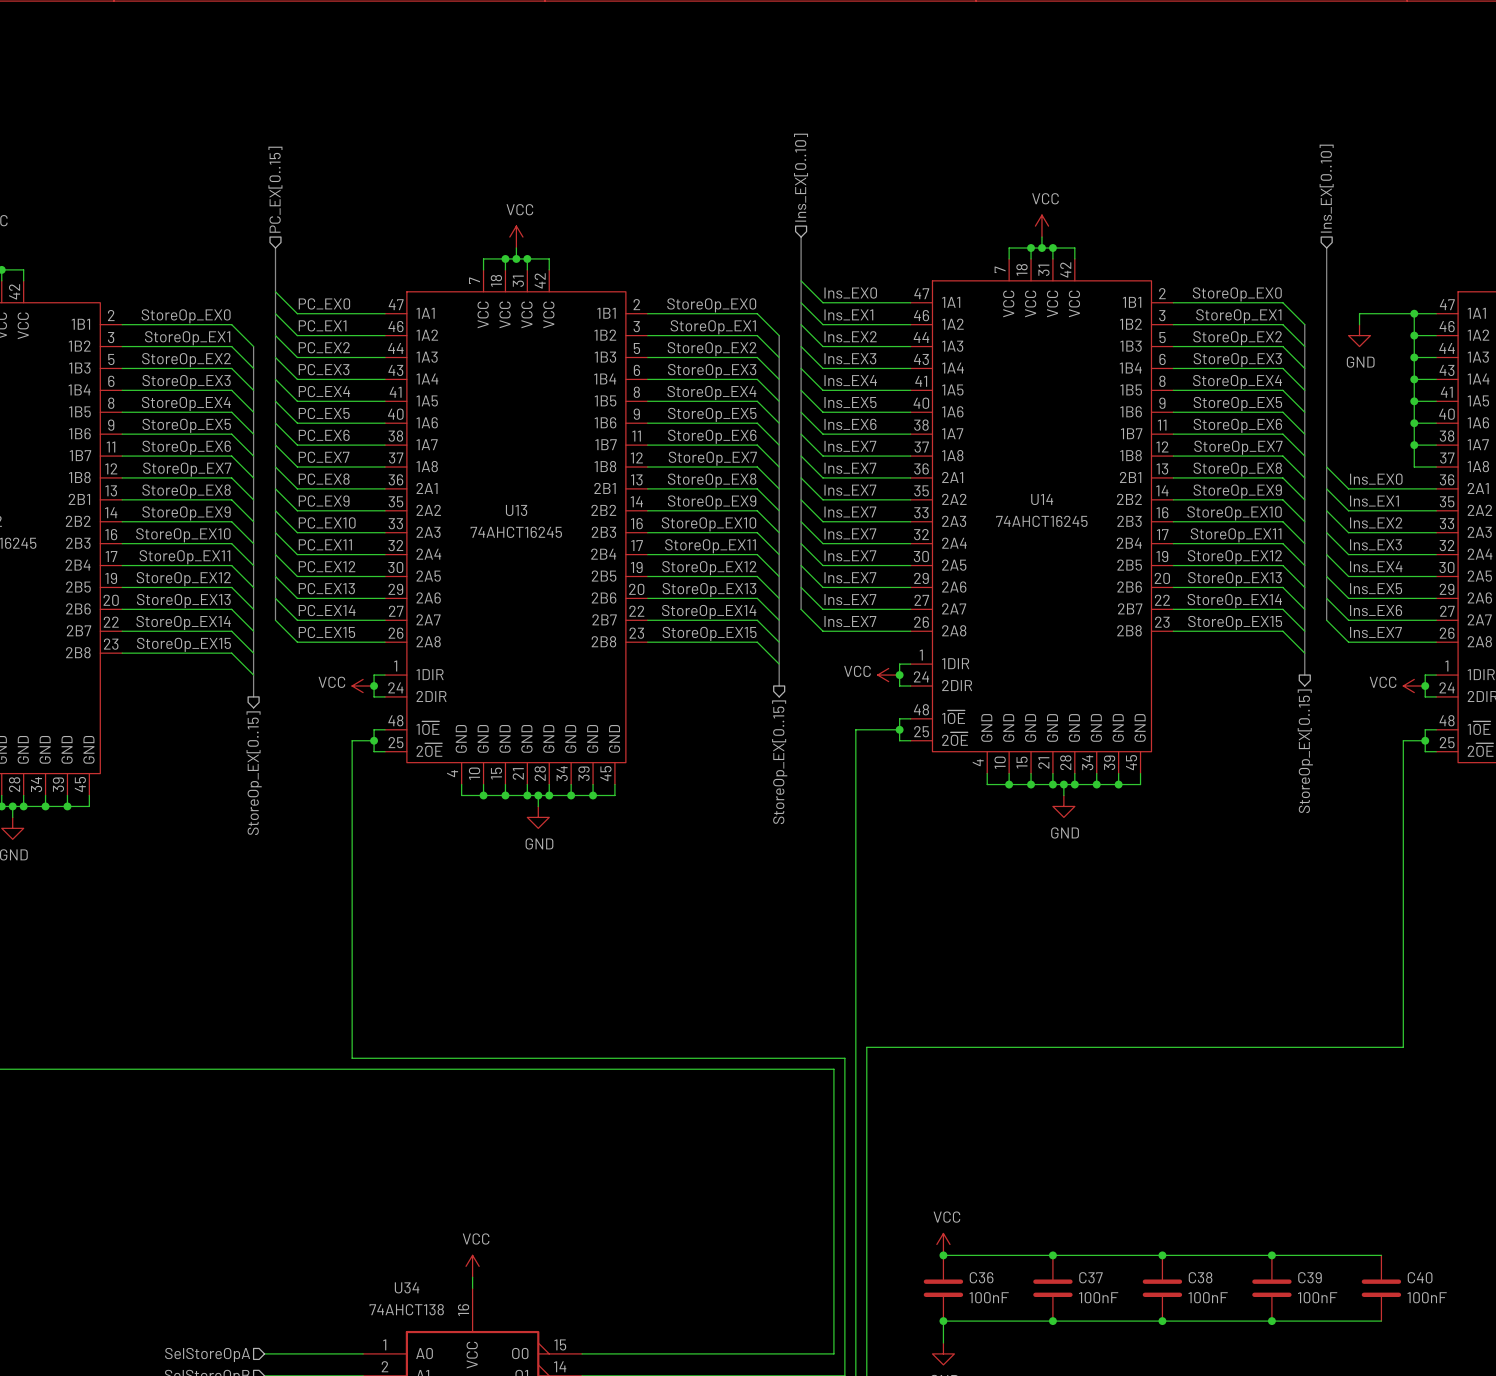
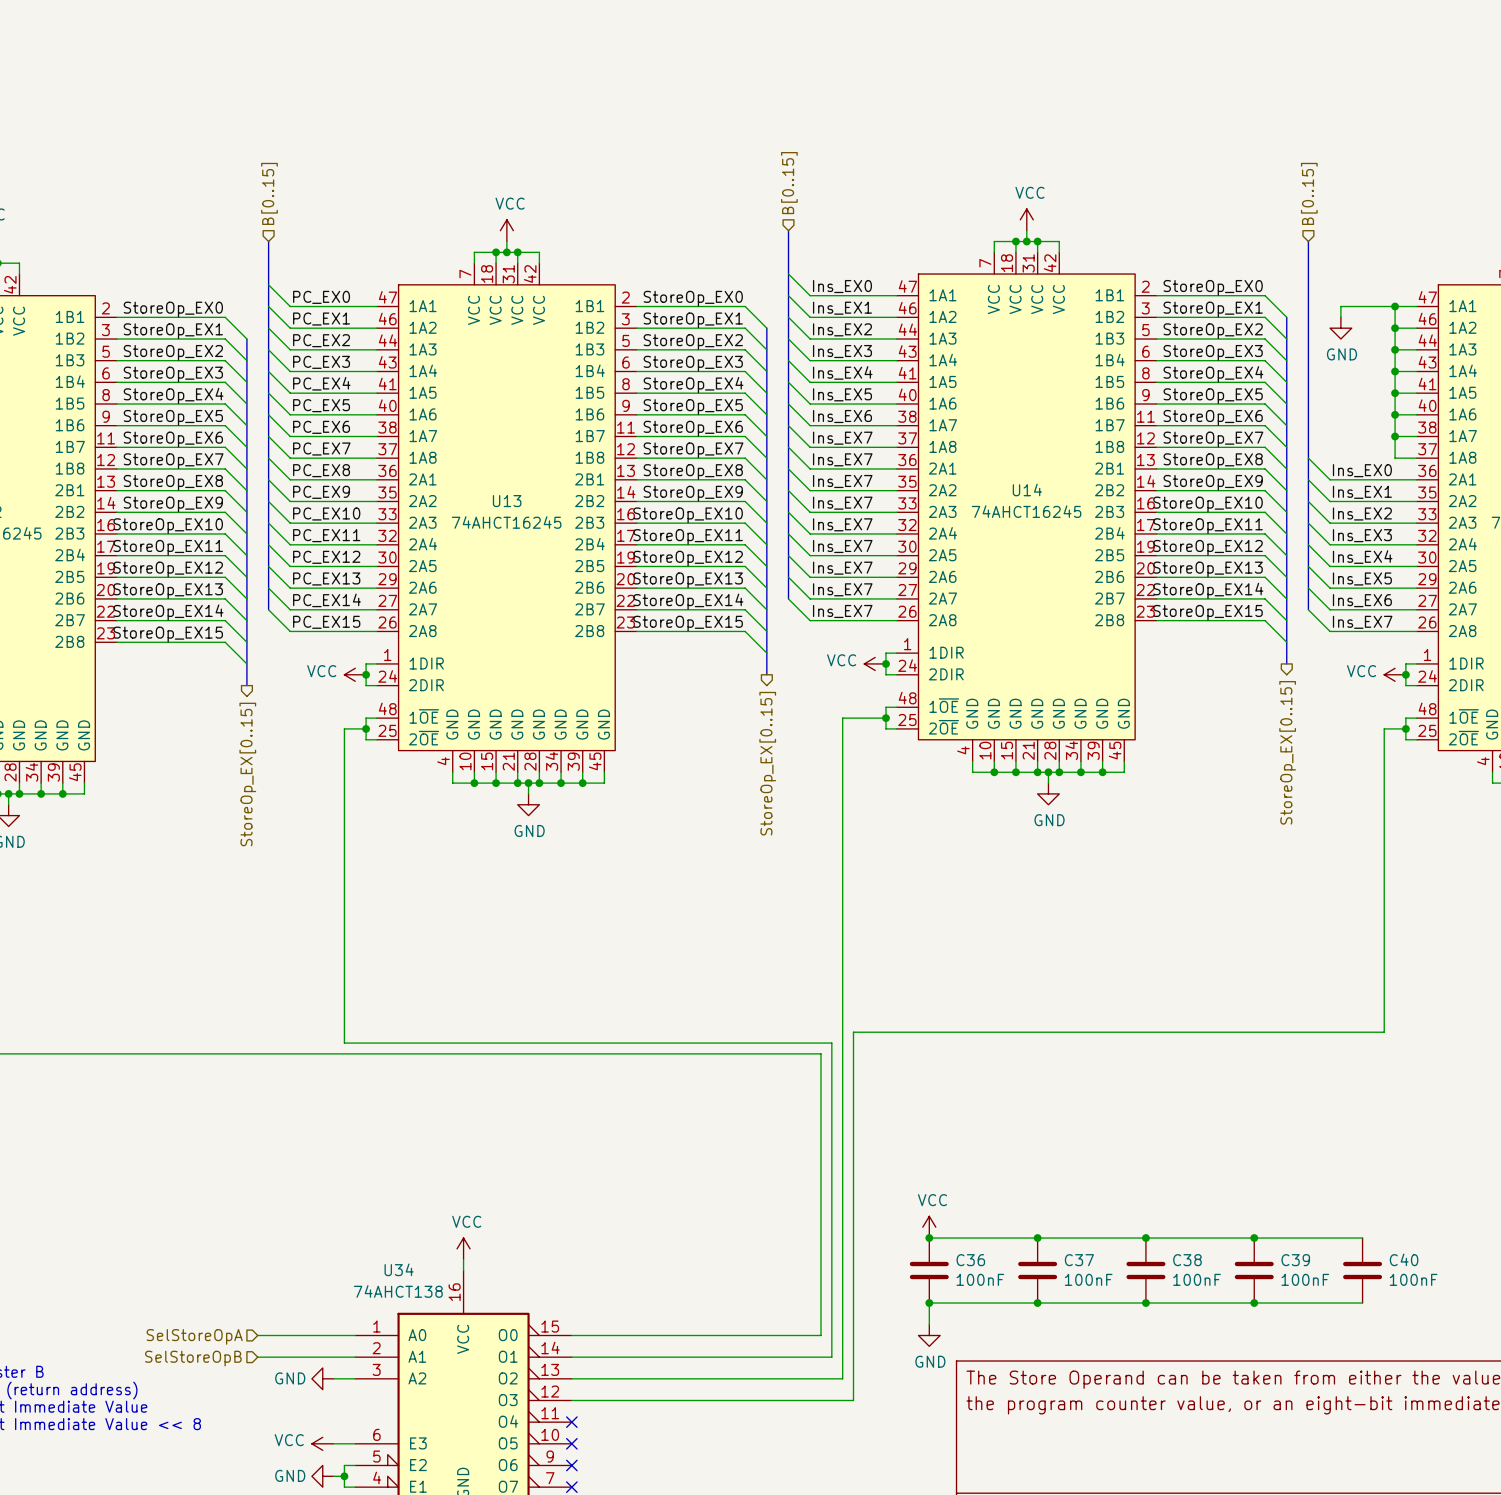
hierarchical label: Ins_EX[0..10] (801, 177) -> B[0..15] (789, 183)
hierarchical label: Ins_EX[0..10] (1326, 188) -> B[0..15] (1309, 193)
hierarchical label: PC_EX[0..15] (275, 189) -> B[0..15] (269, 193)

